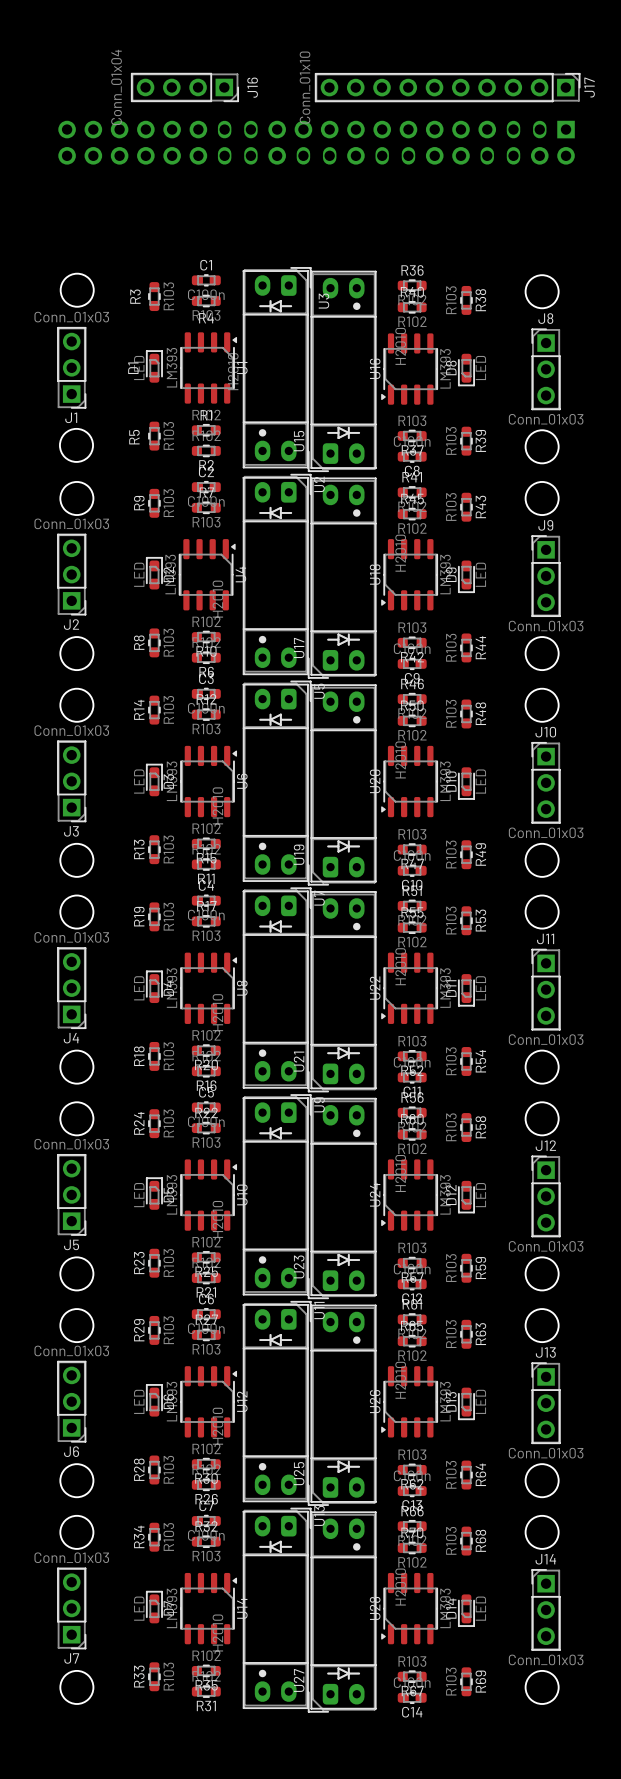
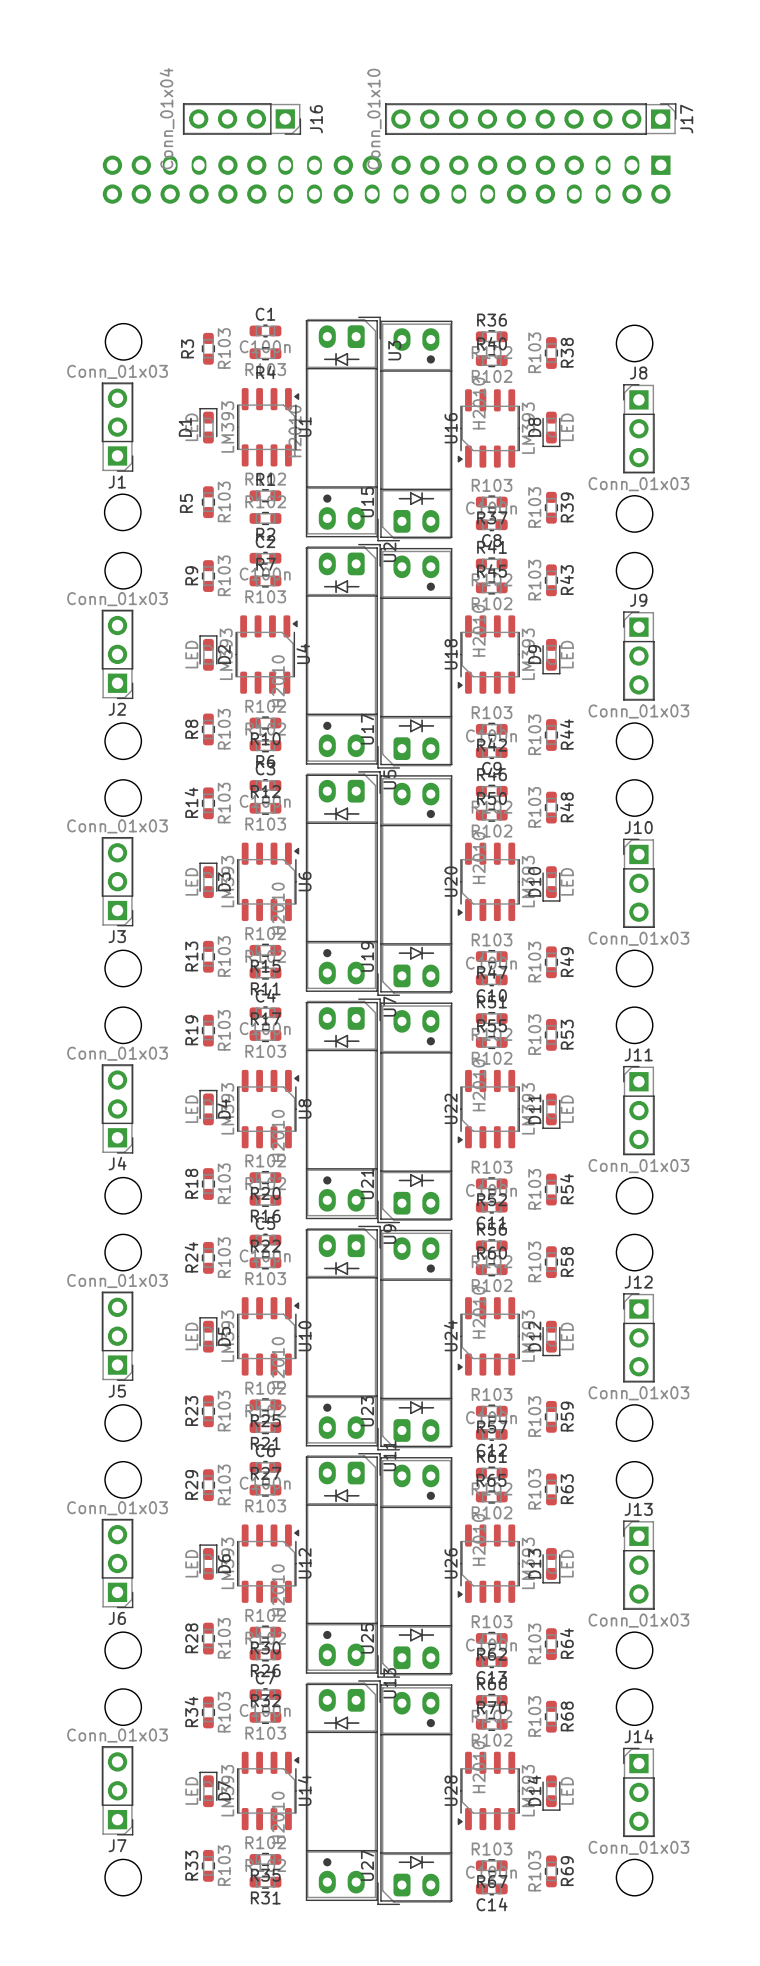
part footprint: [58, 120, 575, 165] -> [102, 155, 671, 204]

